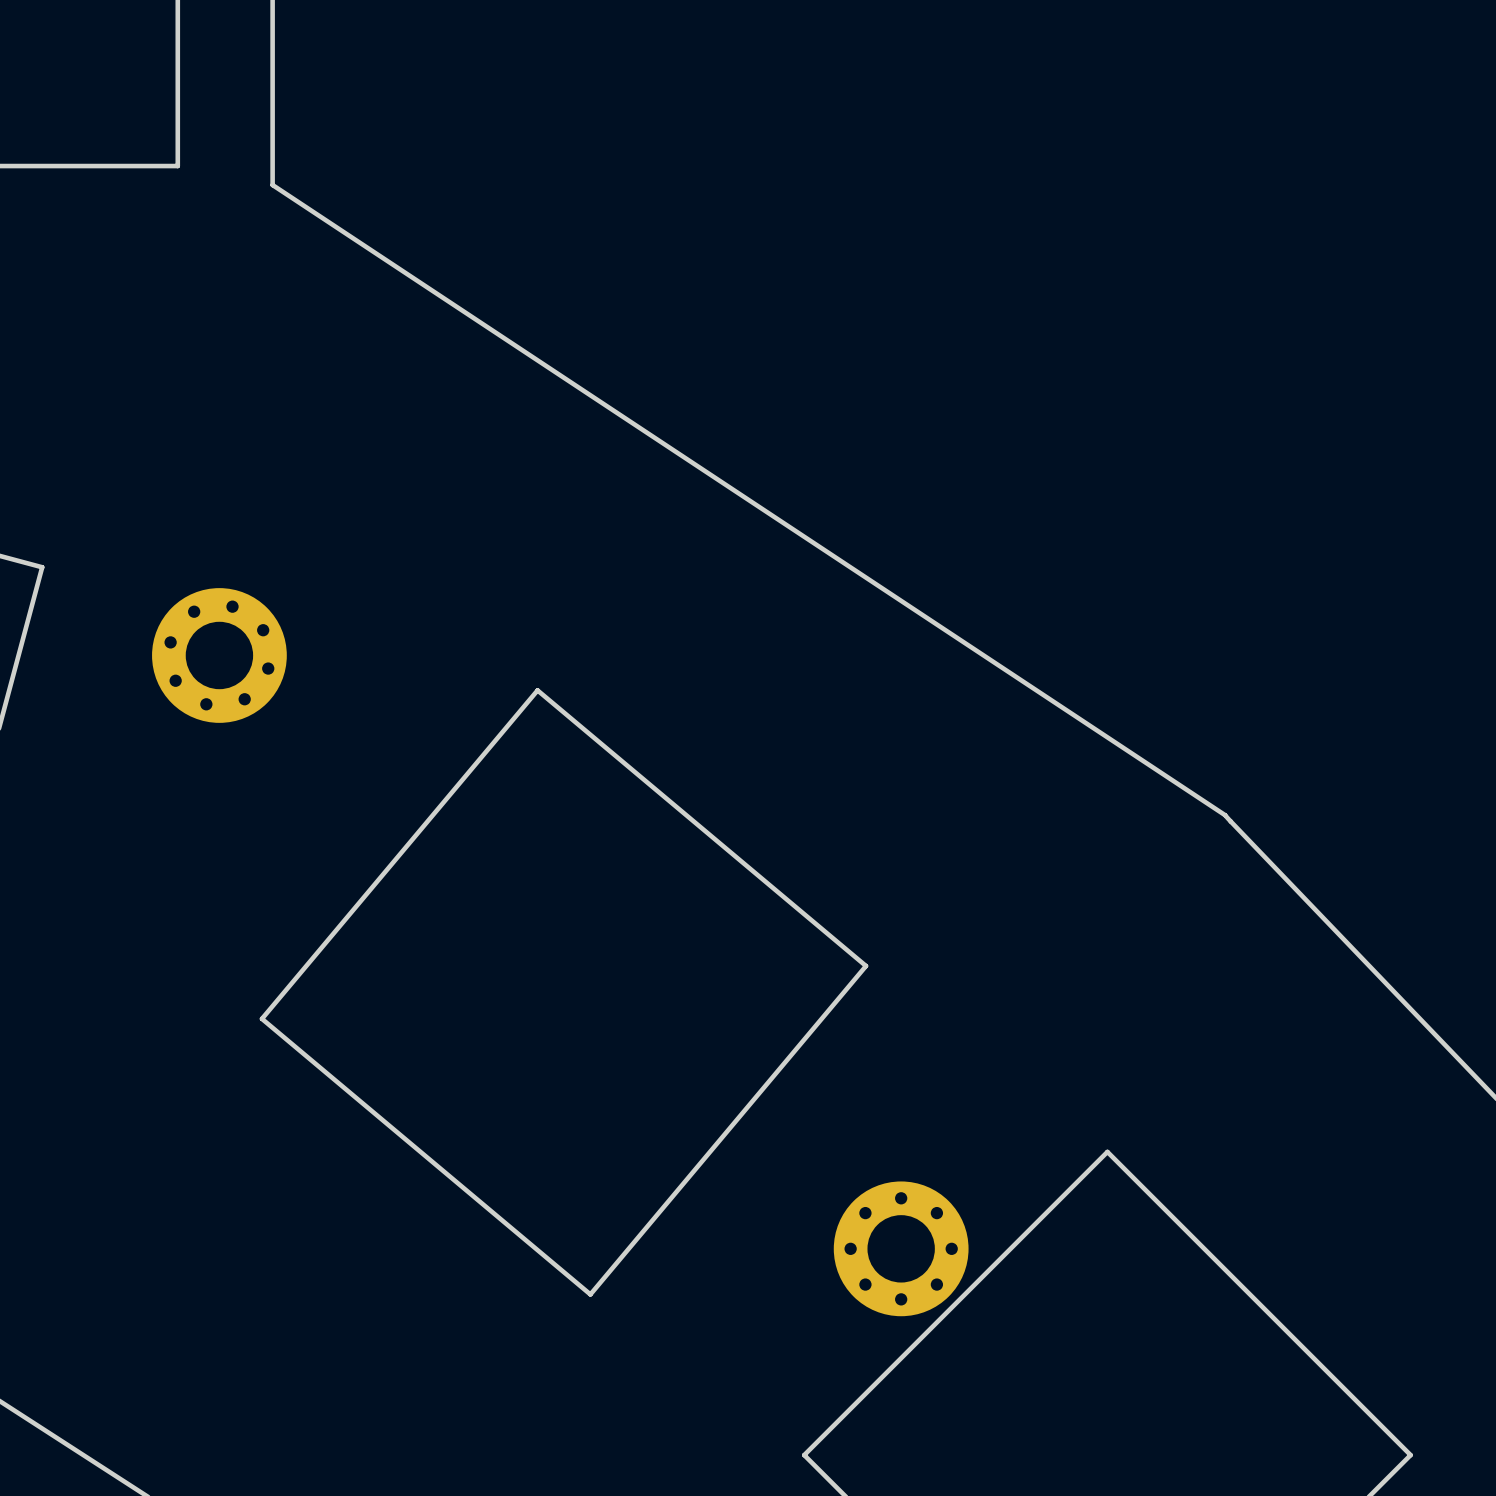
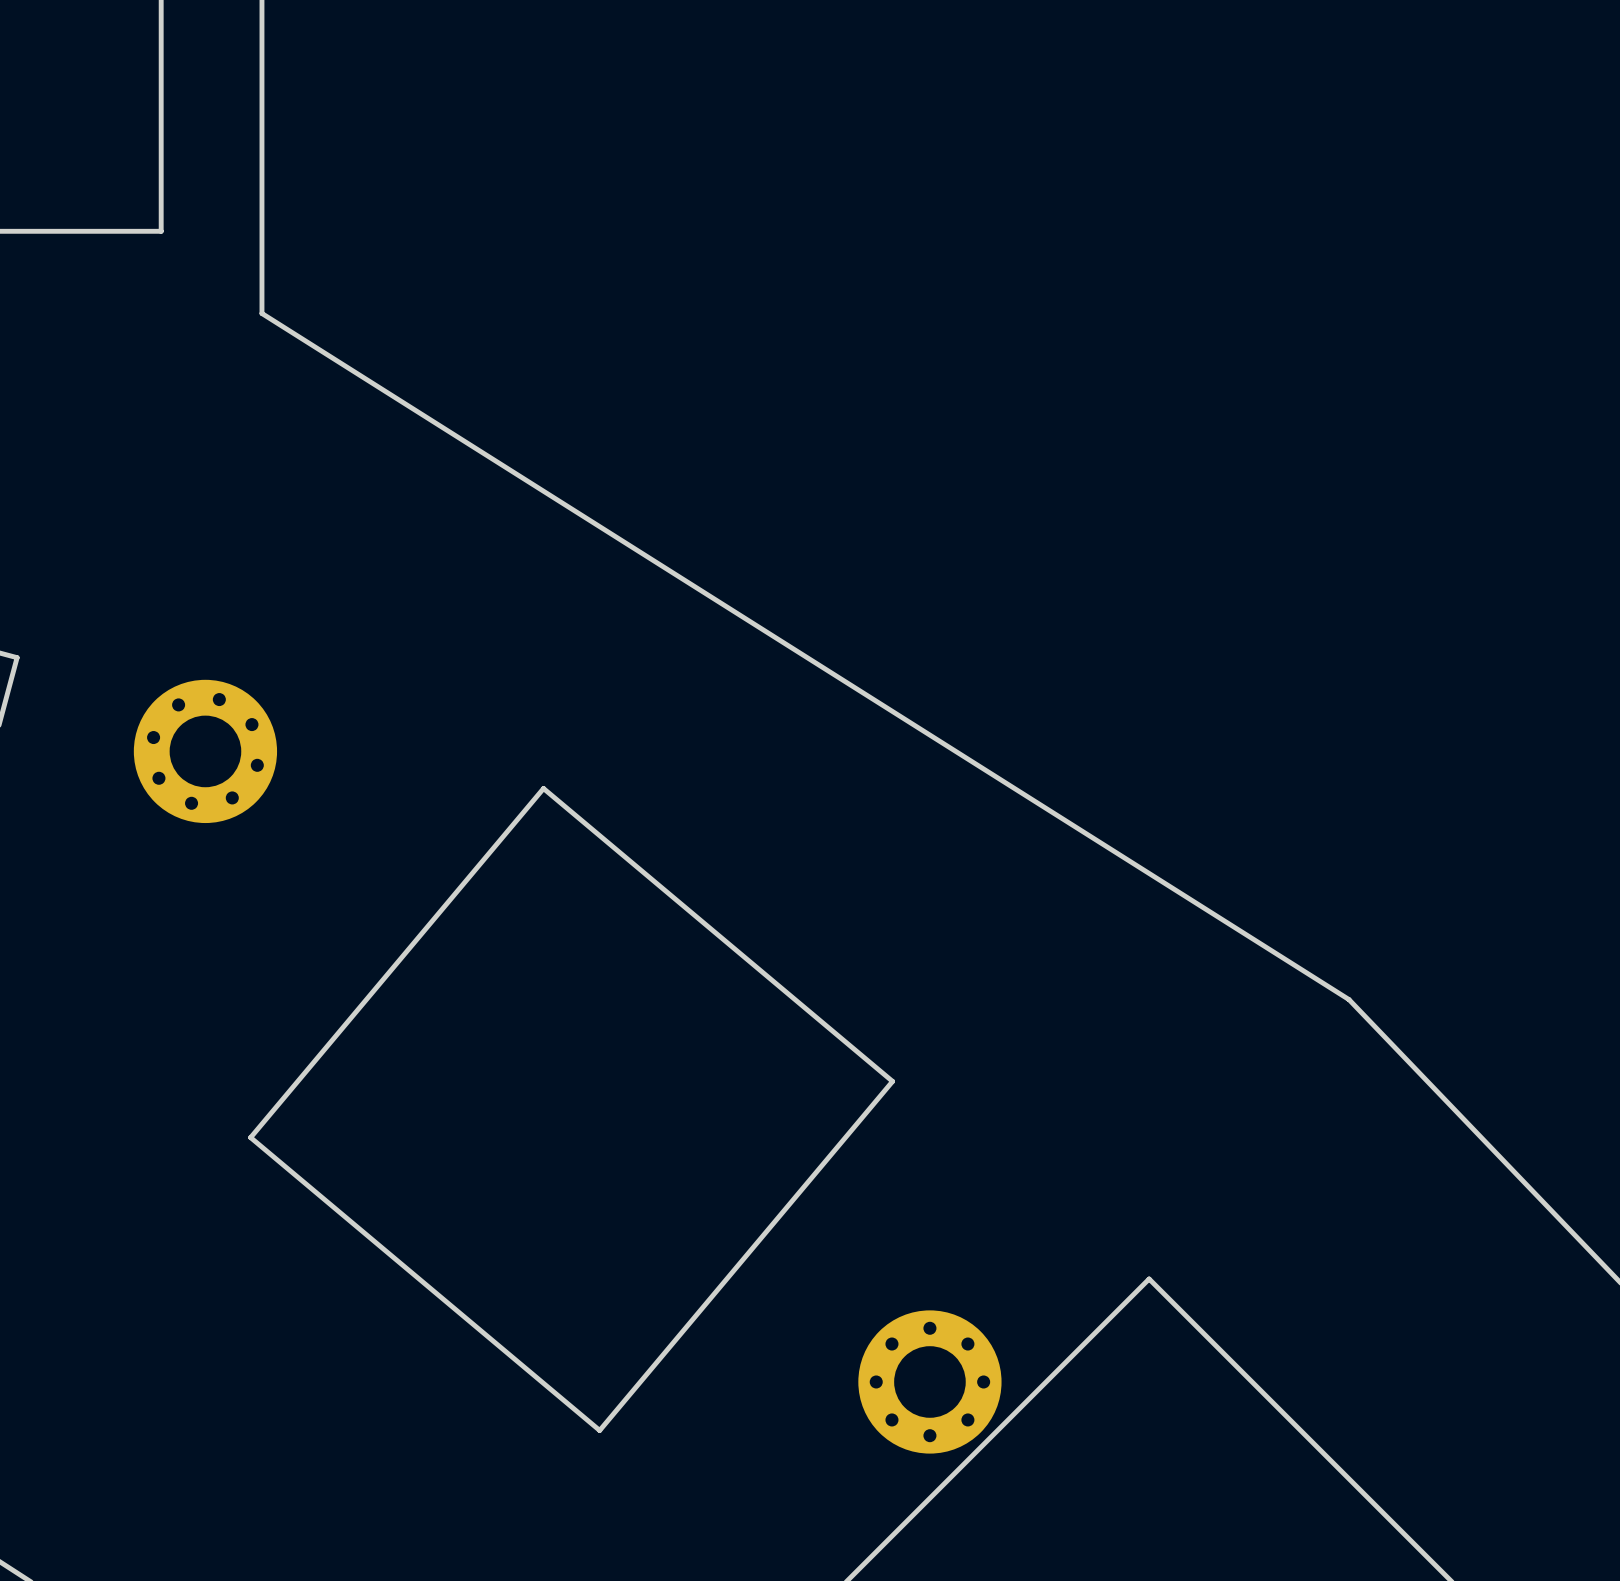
board edge: (272, 185) (1225, 815) (1295, 889) -> (261, 251) (261, 313) (1349, 999)

